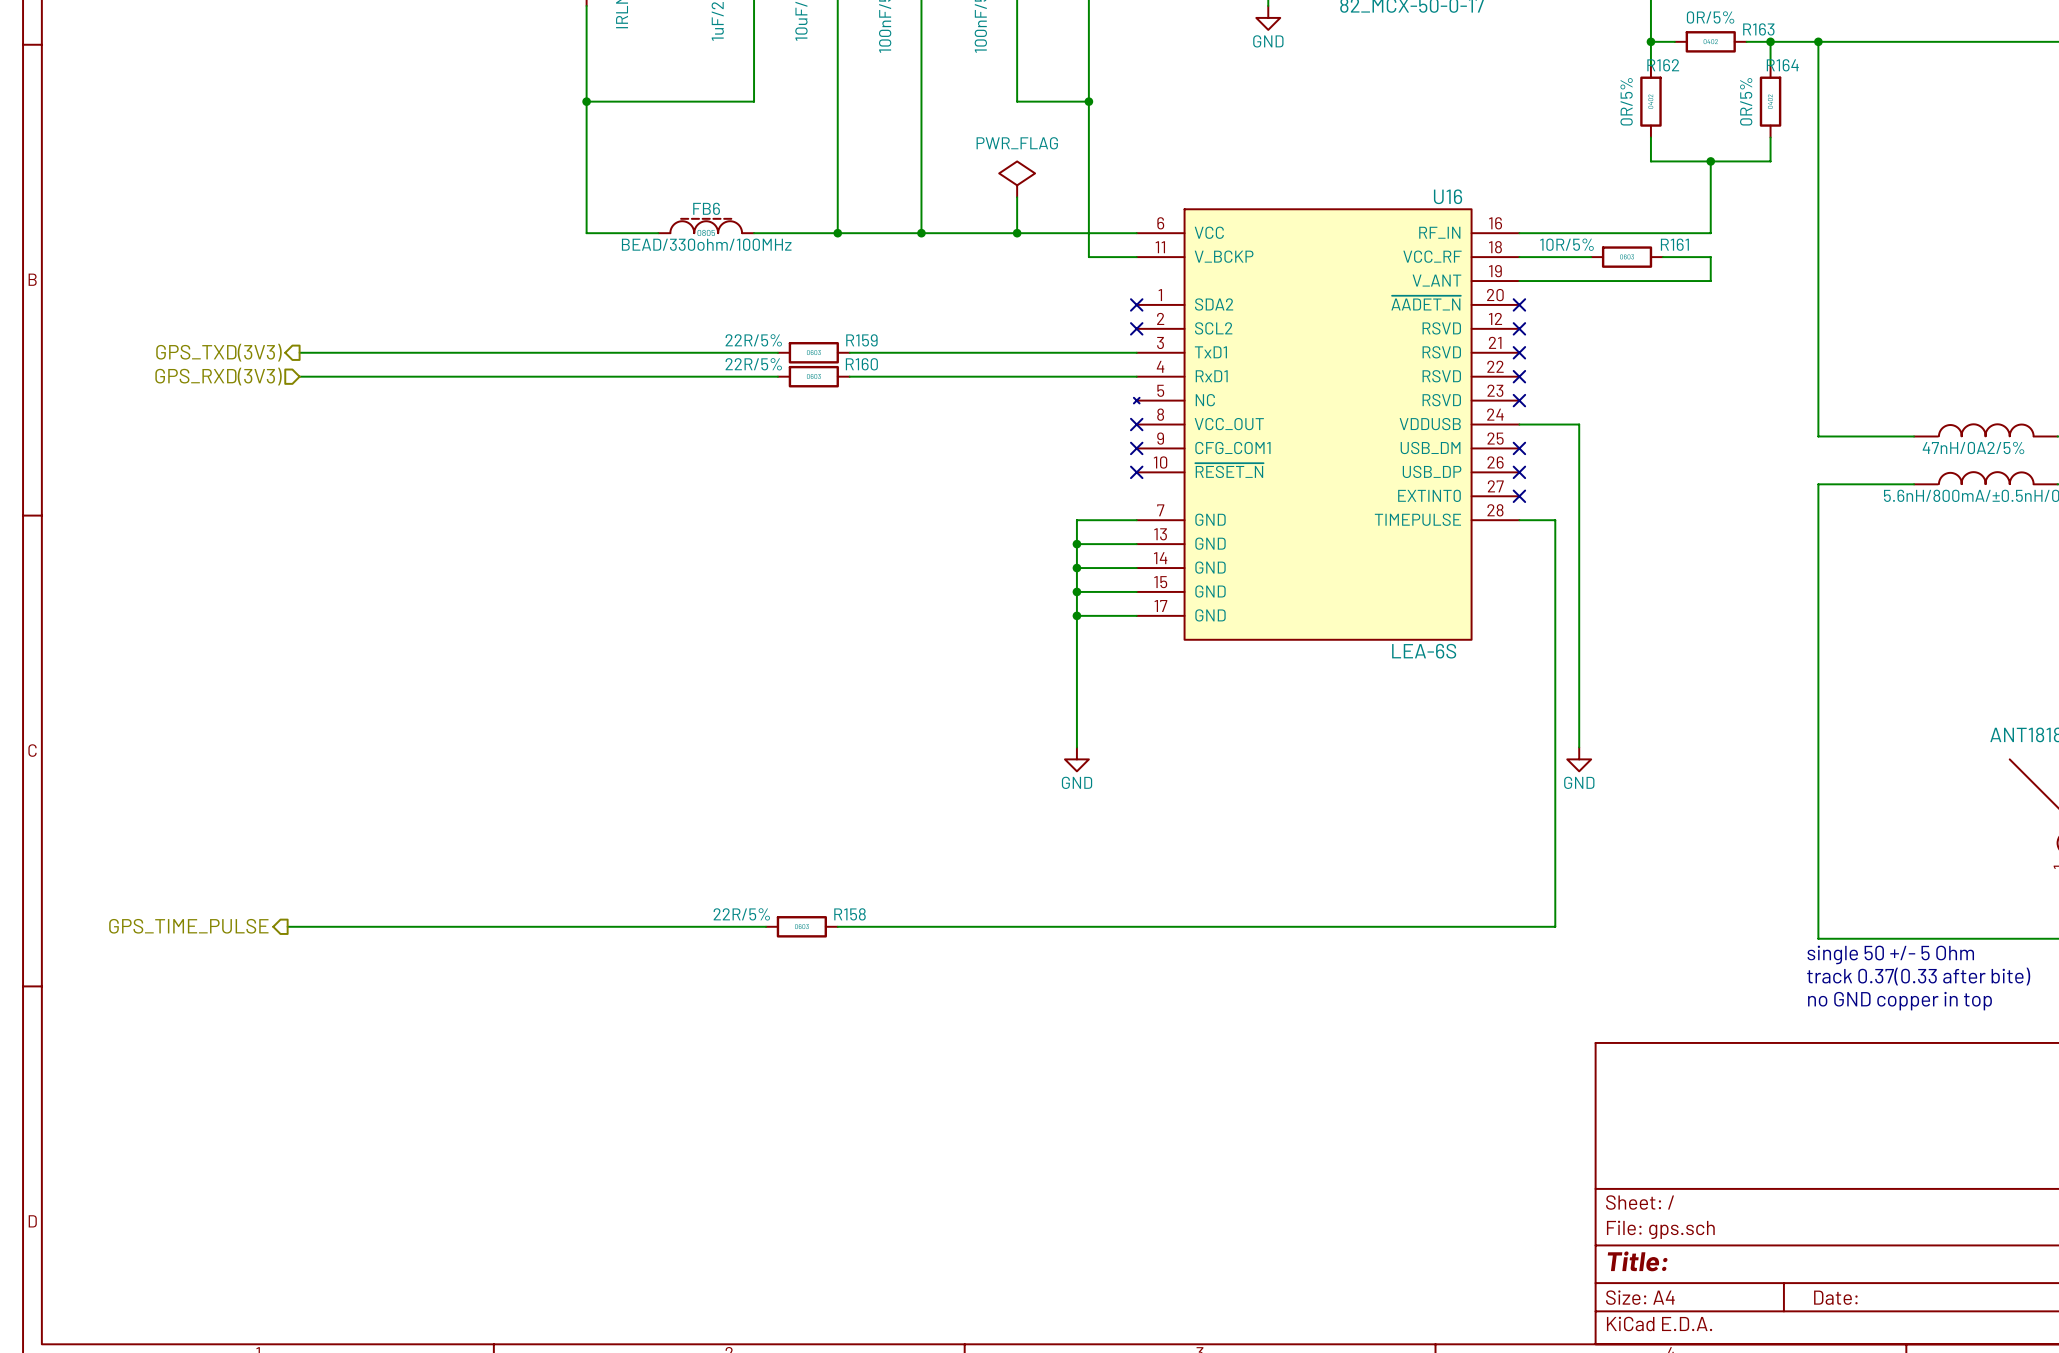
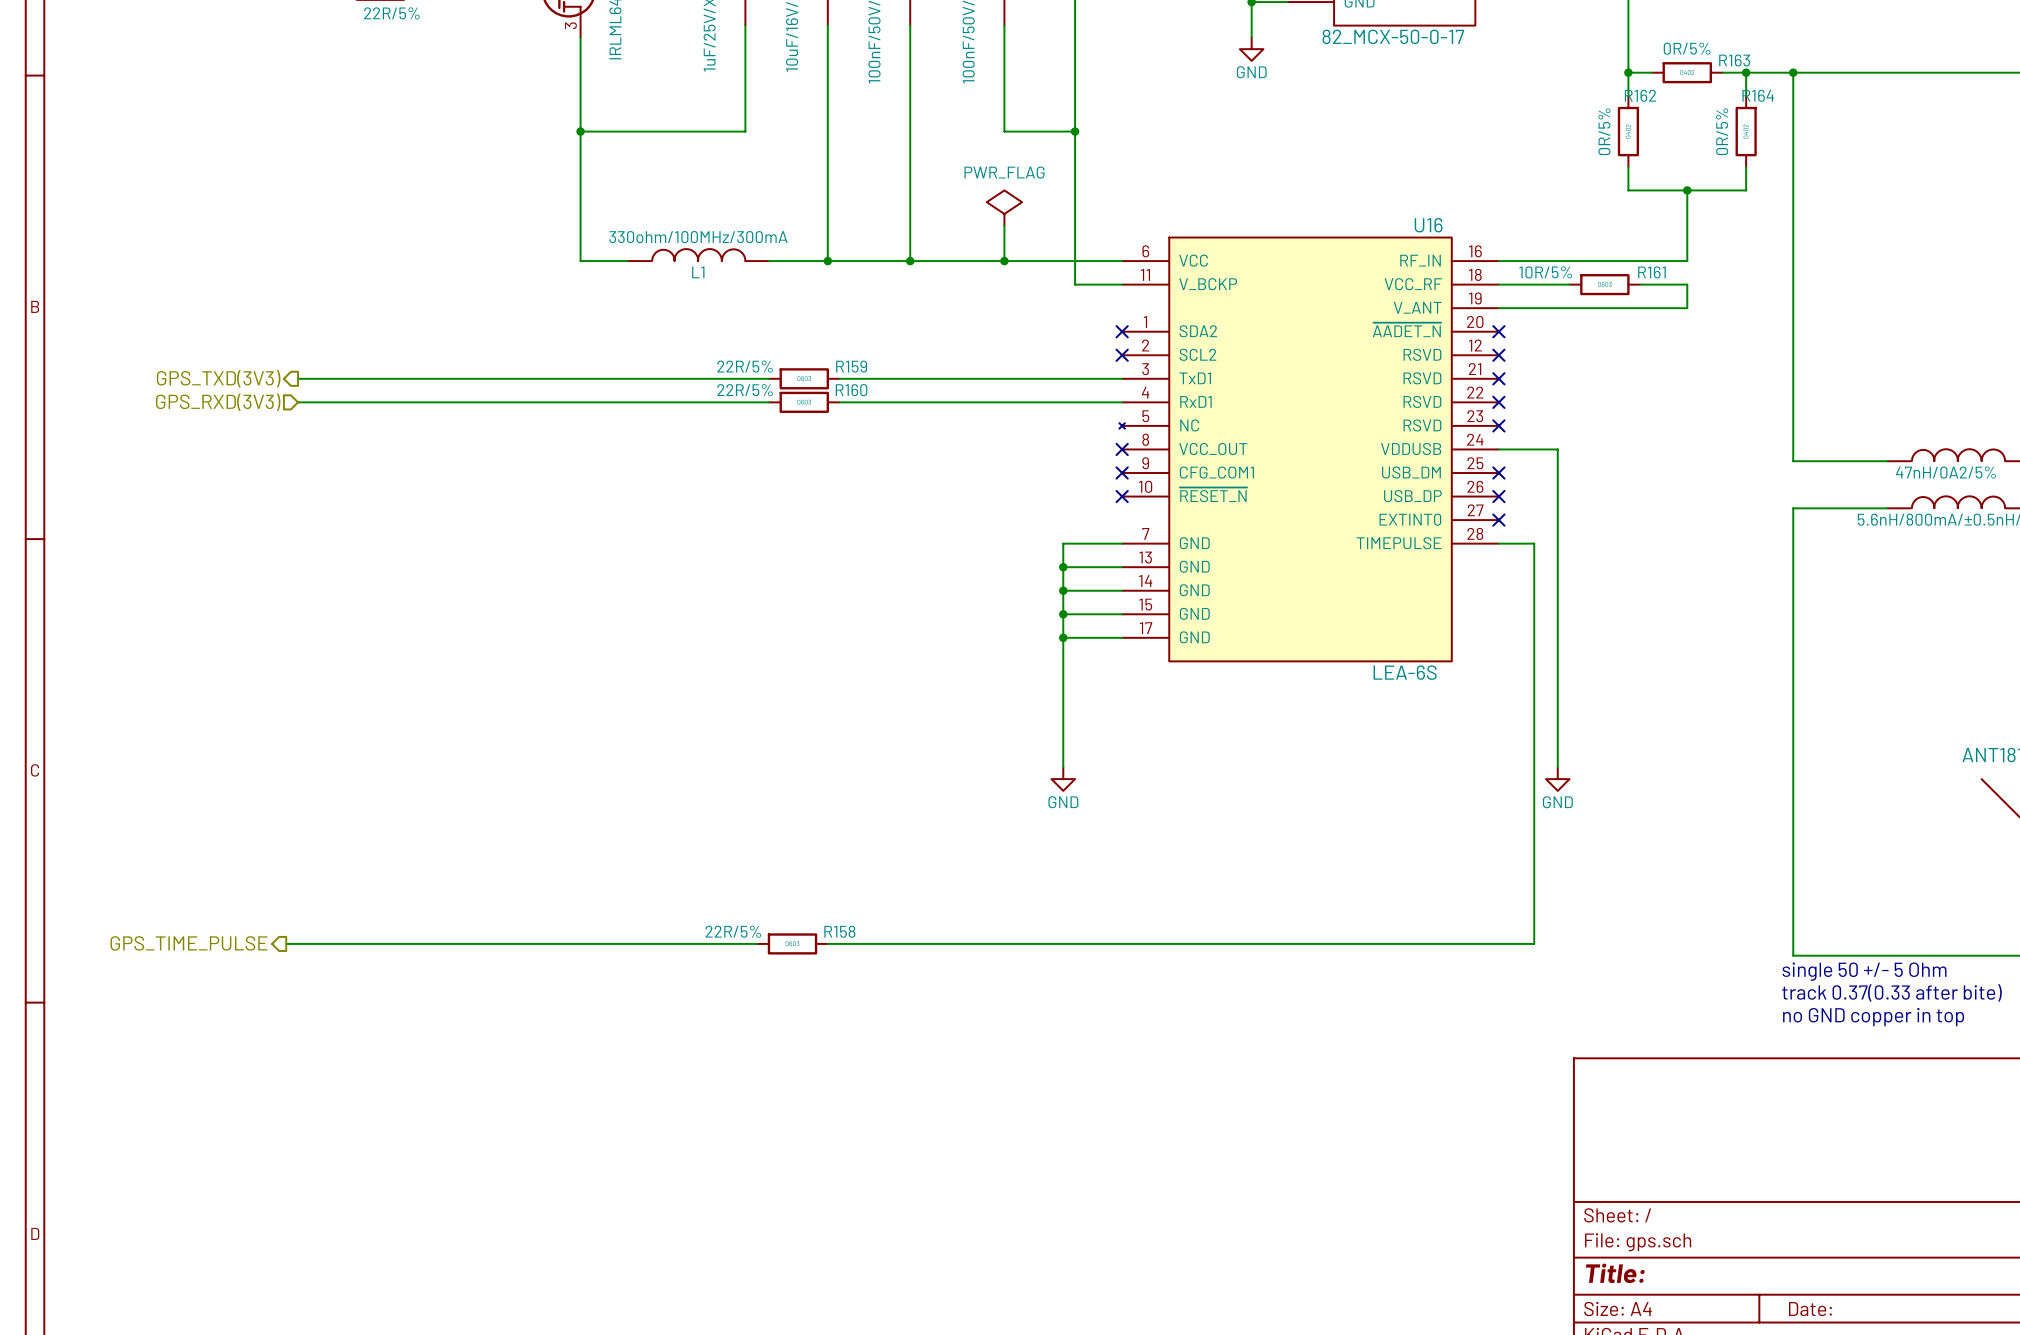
FB6: BEAD/330ohm/100MHz (706, 226) -> none
L1: none -> 330ohm/100MHz/300mA (698, 255)

